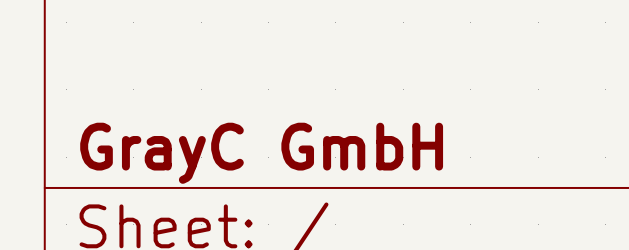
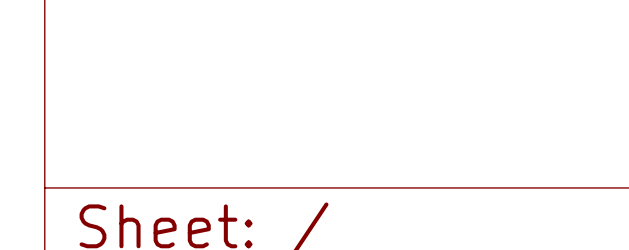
title block: GrayC GmbH (261, 153) -> none

